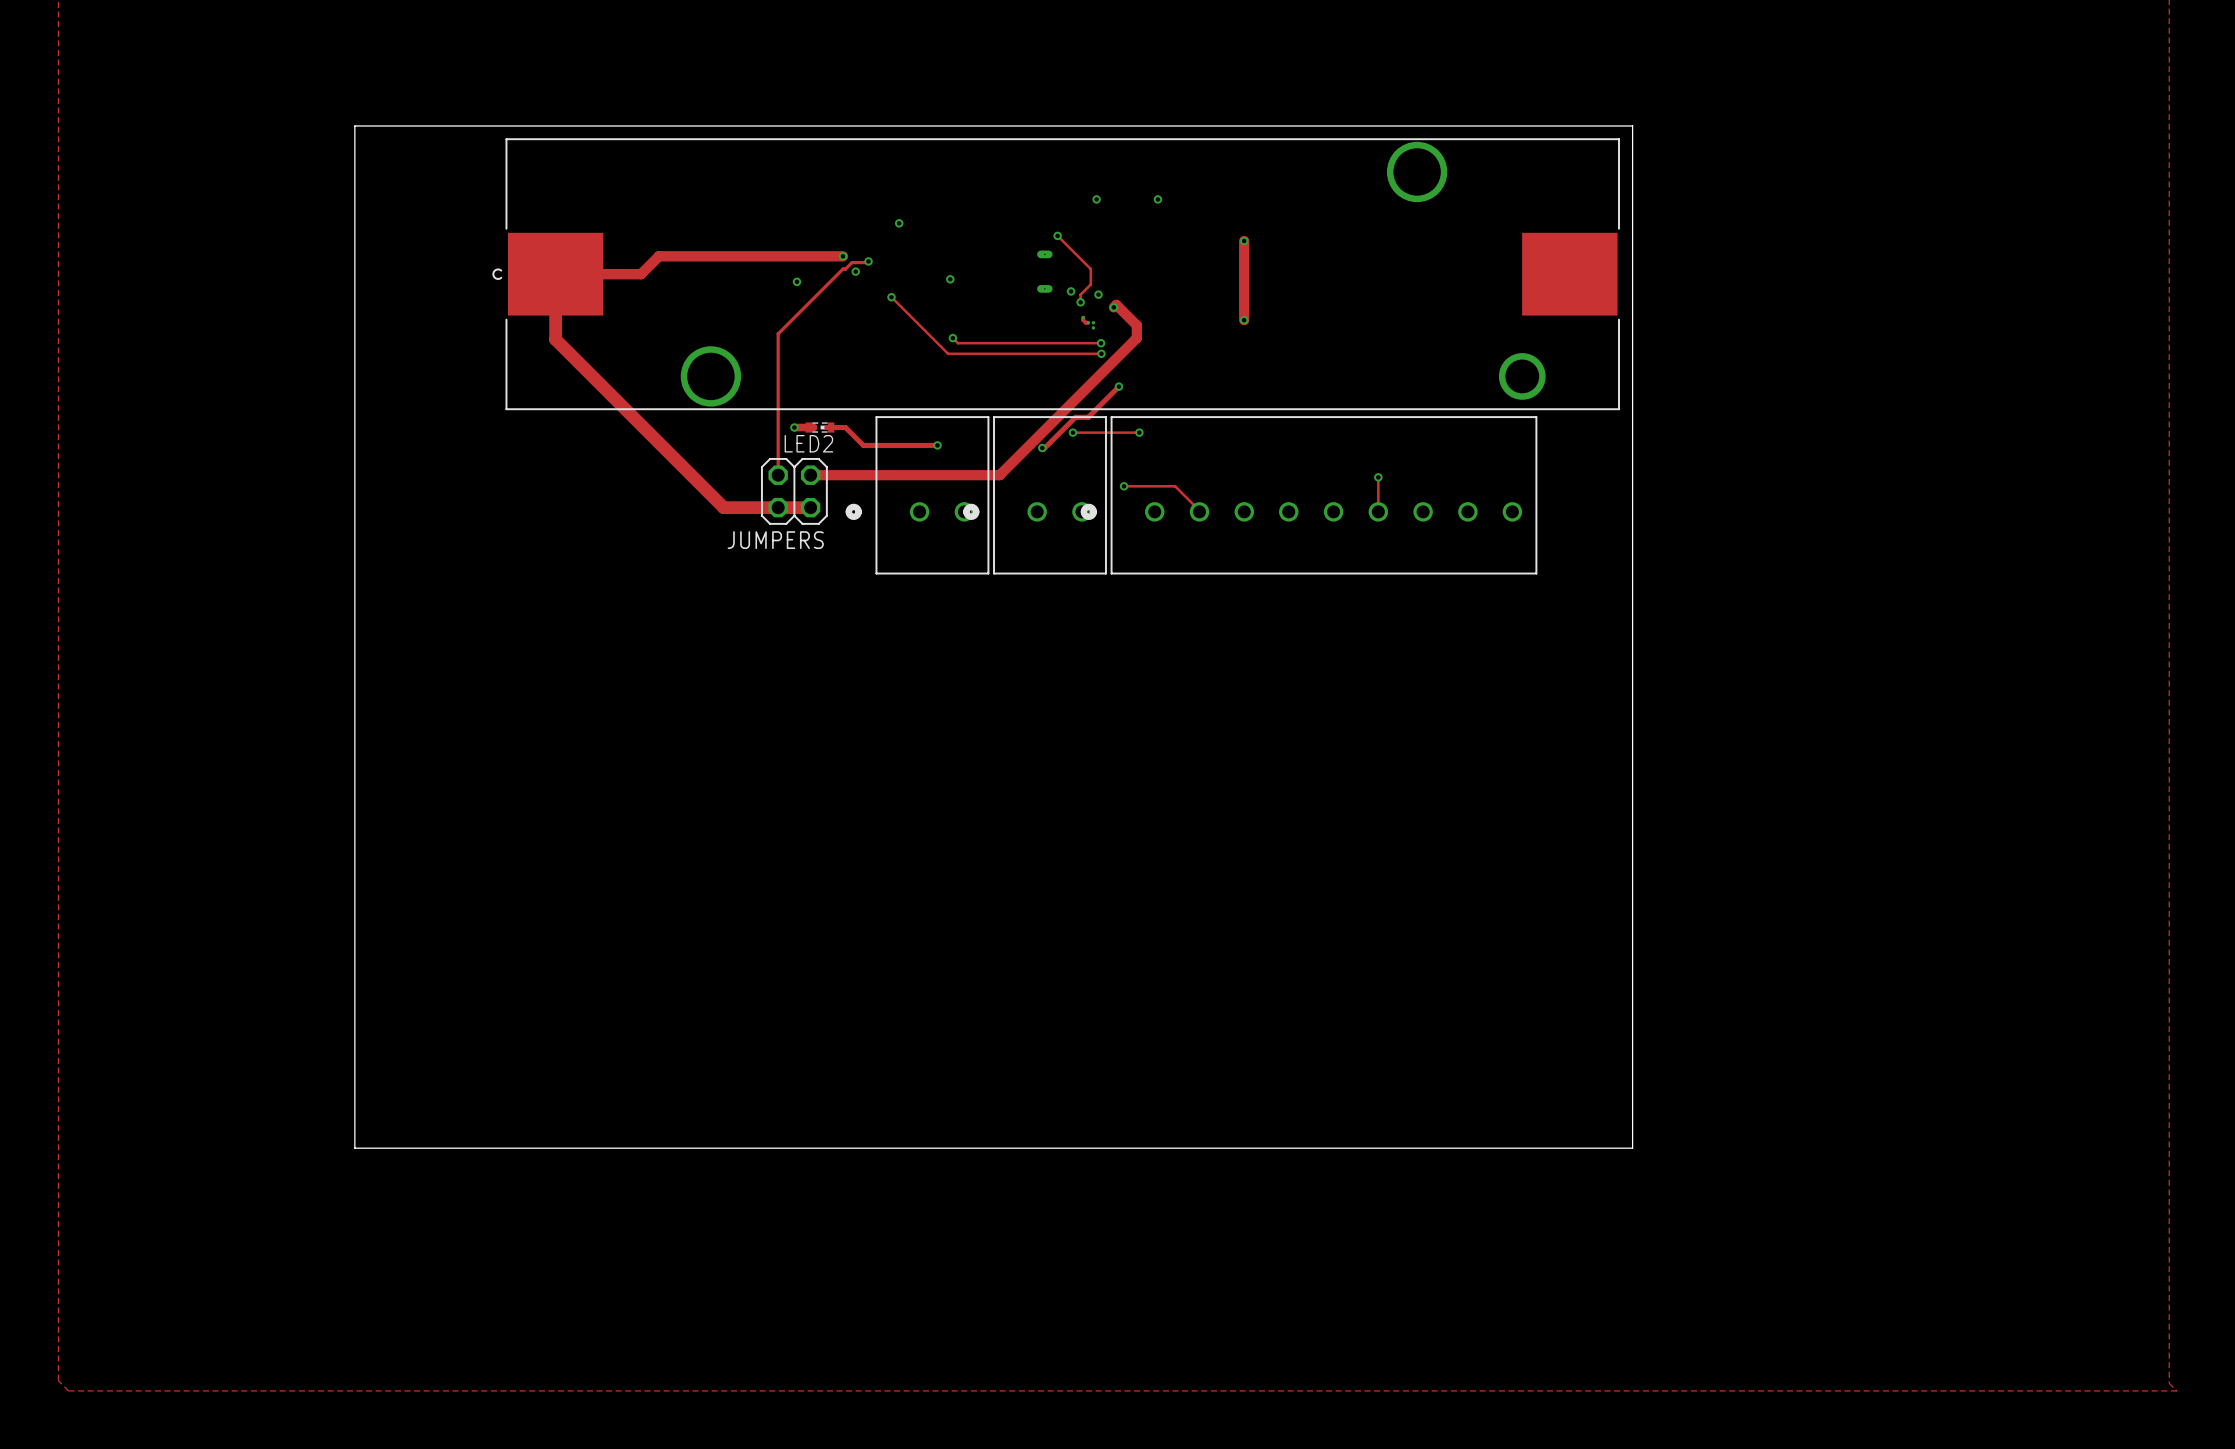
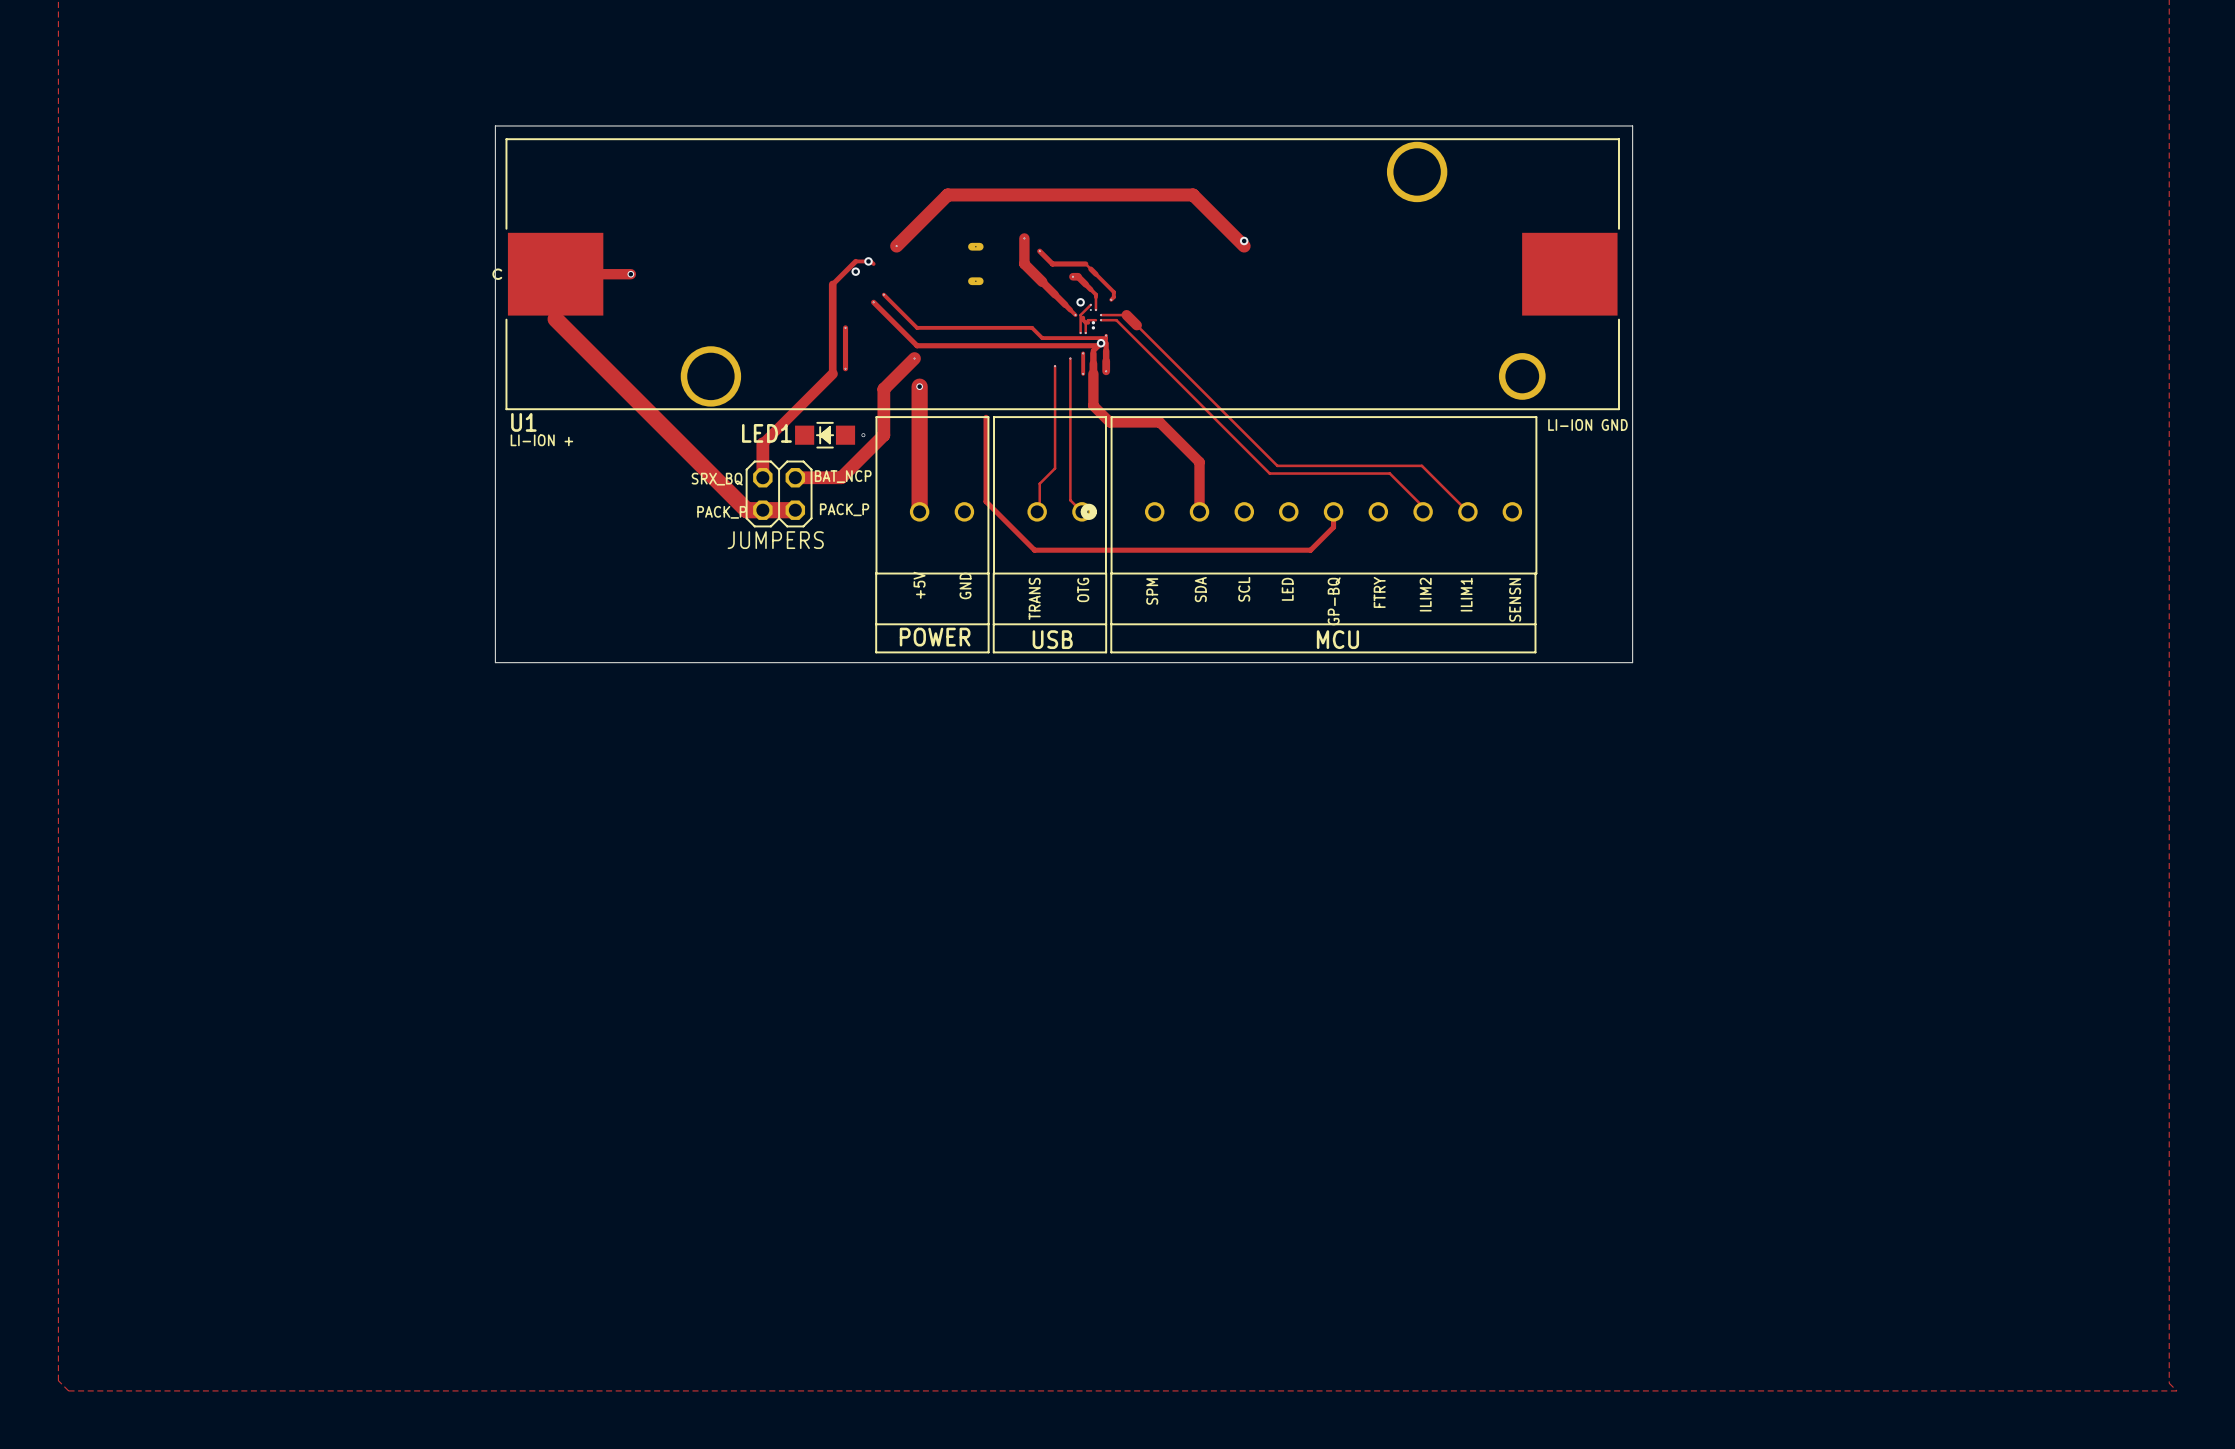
board edge: (495, 125) (354, 125) (354, 1148) (1632, 1148) (1632, 662) -> (495, 125) (495, 662) (1632, 662)
via: (1096, 199) -> none
via: (1157, 199) -> none
via: (899, 223) -> none
track: (1057, 235) (1085, 263) -> (1039, 251) (1052, 263) (1085, 263)
via: (1057, 235) -> none
track: none -> (1024, 238) (1024, 263) (1075, 315)
via: none -> (1024, 238)
track: (1244, 240) (1244, 320) -> none
track: none -> (896, 246) (947, 194) (1193, 194) (1244, 246)
via: none -> (896, 246)
via: none -> (1039, 251)
track: (842, 256) (658, 256) (641, 274) (630, 274) -> none
via: (842, 256) -> none
track: (868, 261) (851, 262) (842, 269) (778, 333) (778, 475) -> none
track: none -> (873, 263) (871, 261) (855, 261) (832, 284) (832, 373) (762, 443) (762, 477)
track: (1090, 269) (1090, 284) (1080, 294) (1080, 302) -> (1090, 269) (1113, 292) (1113, 297) (1111, 299)
part position: (1044, 271) -> (975, 263)
via: none -> (630, 274)
track: none -> (1072, 276) (1078, 276) (1095, 294) (1095, 309)
via: none -> (1072, 276)
via: (950, 279) -> none
via: (796, 281) -> none
via: (1071, 291) -> none
track: none -> (883, 294) (917, 327) (1032, 327) (1042, 338) (1106, 338)
via: none -> (883, 294)
via: (1098, 294) -> none
track: (891, 297) (948, 353) (1101, 353) -> none
via: (891, 297) -> none
via: none -> (1111, 299)
via: none -> (873, 302)
track: none -> (1090, 304) (1080, 315) (1080, 332)
via: none -> (1090, 304)
track: (1113, 307) (1116, 304) (1126, 315) -> (1101, 315) (1126, 315)
via: (1113, 307) -> none
via: none -> (1090, 309)
via: none -> (1095, 309)
via: none -> (1075, 315)
via: none -> (1101, 315)
via: (1083, 317) -> none
track: (555, 319) (555, 339) (723, 507) (810, 507) -> (555, 319) (746, 510) (795, 510)
track: none -> (1095, 320) (1088, 320) (1085, 322) (1085, 332)
track: none -> (1101, 320) (1116, 320) (1269, 473) (1389, 473) (1423, 506) (1423, 511)
via: none -> (1101, 320)
via: (1244, 320) -> none
via: (1088, 322) -> none
track: (1136, 325) (1136, 338) (999, 475) (810, 475) -> (1136, 325) (1277, 465) (1421, 465) (1467, 511)
track: none -> (845, 327) (845, 368)
via: none -> (845, 327)
via: none -> (1080, 332)
via: none -> (1085, 332)
track: none -> (1106, 335) (1106, 371)
via: none -> (1106, 335)
track: (952, 338) (957, 343) (1101, 343) -> none
via: (952, 338) -> none
track: none -> (1083, 353) (1083, 373)
via: none -> (1083, 353)
via: (1101, 353) -> none
track: none -> (914, 358) (883, 389) (883, 435) (841, 477) (795, 477)
via: none -> (914, 358)
track: none -> (1070, 358) (1070, 500) (1081, 511)
via: none -> (1070, 358)
track: none -> (1055, 366) (1055, 468) (1039, 483) (1039, 509) (1037, 511)
via: none -> (1055, 366)
via: none -> (845, 368)
via: none -> (1106, 371)
via: none -> (1083, 373)
track: none -> (919, 386) (919, 511)
via: none -> (919, 386)
track: (1118, 386) (1088, 417) (1075, 417) (1043, 449) (1042, 447) -> none
via: (1118, 386) -> none
track: none -> (986, 417) (986, 501) (1034, 550) (1310, 550) (1333, 527) (1333, 511)
U1 name: none -> U1 (523, 422)
text: none -> LI-ION GND (1587, 424)
track: (794, 427) (813, 427) -> none
via: (794, 427) -> none
LED2: (819, 427) -> none
track: (826, 427) (845, 427) (863, 445) (937, 445) -> none
track: (1072, 432) (1139, 432) -> none
via: (1072, 432) -> none
via: (1139, 432) -> none
LED1: none -> (825, 435)
via: none -> (863, 435)
text: none -> LI-ION + (541, 440)
via: (937, 445) -> none
via: (1042, 447) -> none
text: none -> BAT_NCP (843, 476)
track: (1378, 477) (1378, 511) -> none
via: (1378, 477) -> none
text: none -> SRX_BQ (717, 479)
track: (1124, 486) (1175, 486) (1199, 510) -> (873, 302) (917, 345) (1098, 345) (1093, 350) (1093, 405) (1110, 422) (1159, 422) (1199, 462) (1199, 510)
via: (1124, 486) -> none
JUMPERS position: (794, 491) -> (779, 493)
part: (917, 495) -> none
POWER: none -> (932, 495)
part: (1035, 495) -> none
USB: none -> (1049, 495)
text: none -> PACK_P (844, 509)
text: none -> PACK_P (721, 512)
line: none -> (876, 573) (876, 652) (988, 652) (988, 573)
line: none -> (993, 573) (993, 652) (1106, 652) (1106, 573)
line: none -> (1111, 573) (1111, 652) (1535, 652) (1535, 573)
text: none -> +5V (919, 585)
text: none -> GND (965, 585)
text: none -> OTG (1083, 589)
text: none -> SDA (1200, 589)
text: none -> SCL (1244, 589)
text: none -> LED (1287, 589)
text: none -> SPM (1152, 591)
text: none -> FTRY (1379, 592)
text: none -> ILIM2 (1425, 594)
text: none -> ILIM1 (1466, 594)
text: none -> TRANS (1034, 598)
text: none -> SENSN (1515, 599)
text: none -> GP-BQ (1334, 601)
line: none -> (876, 624) (988, 624)
line: none -> (993, 624) (1106, 624)
line: none -> (1111, 624) (1535, 624)
MCU name: none -> MCU (1337, 639)

